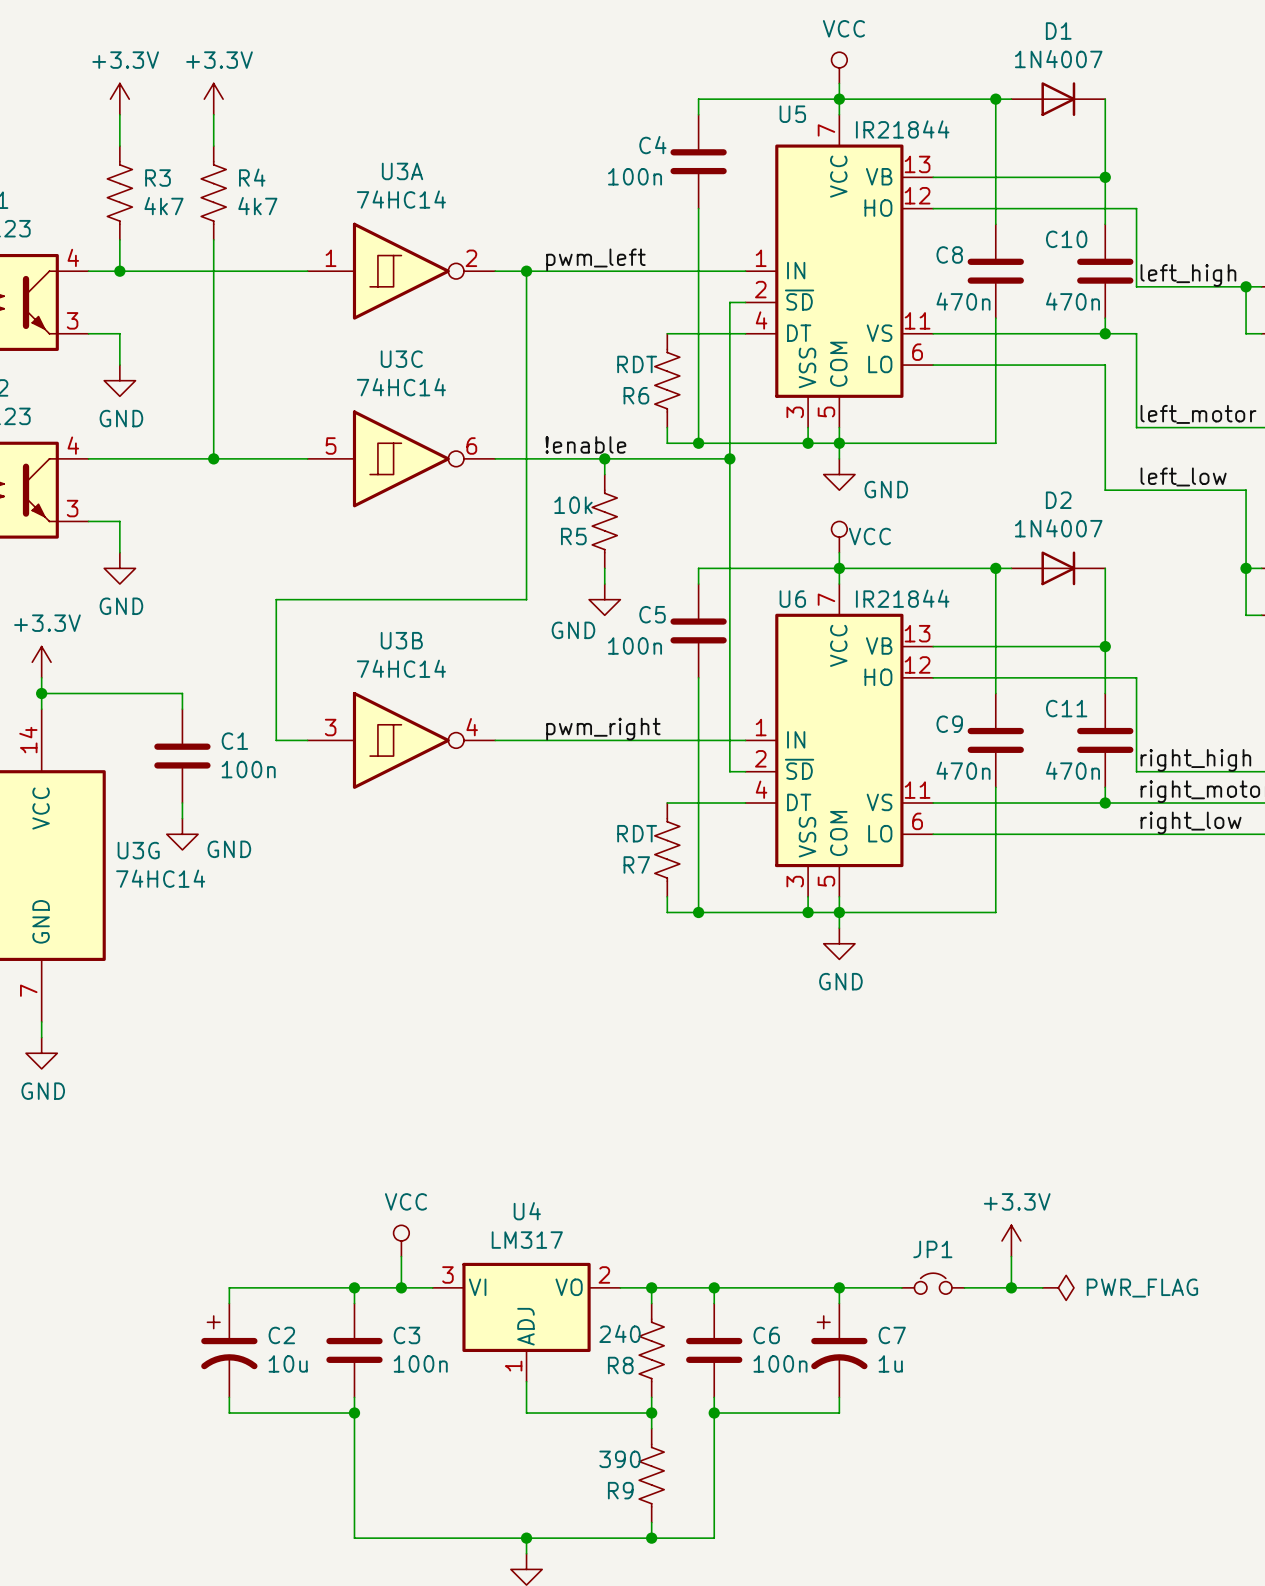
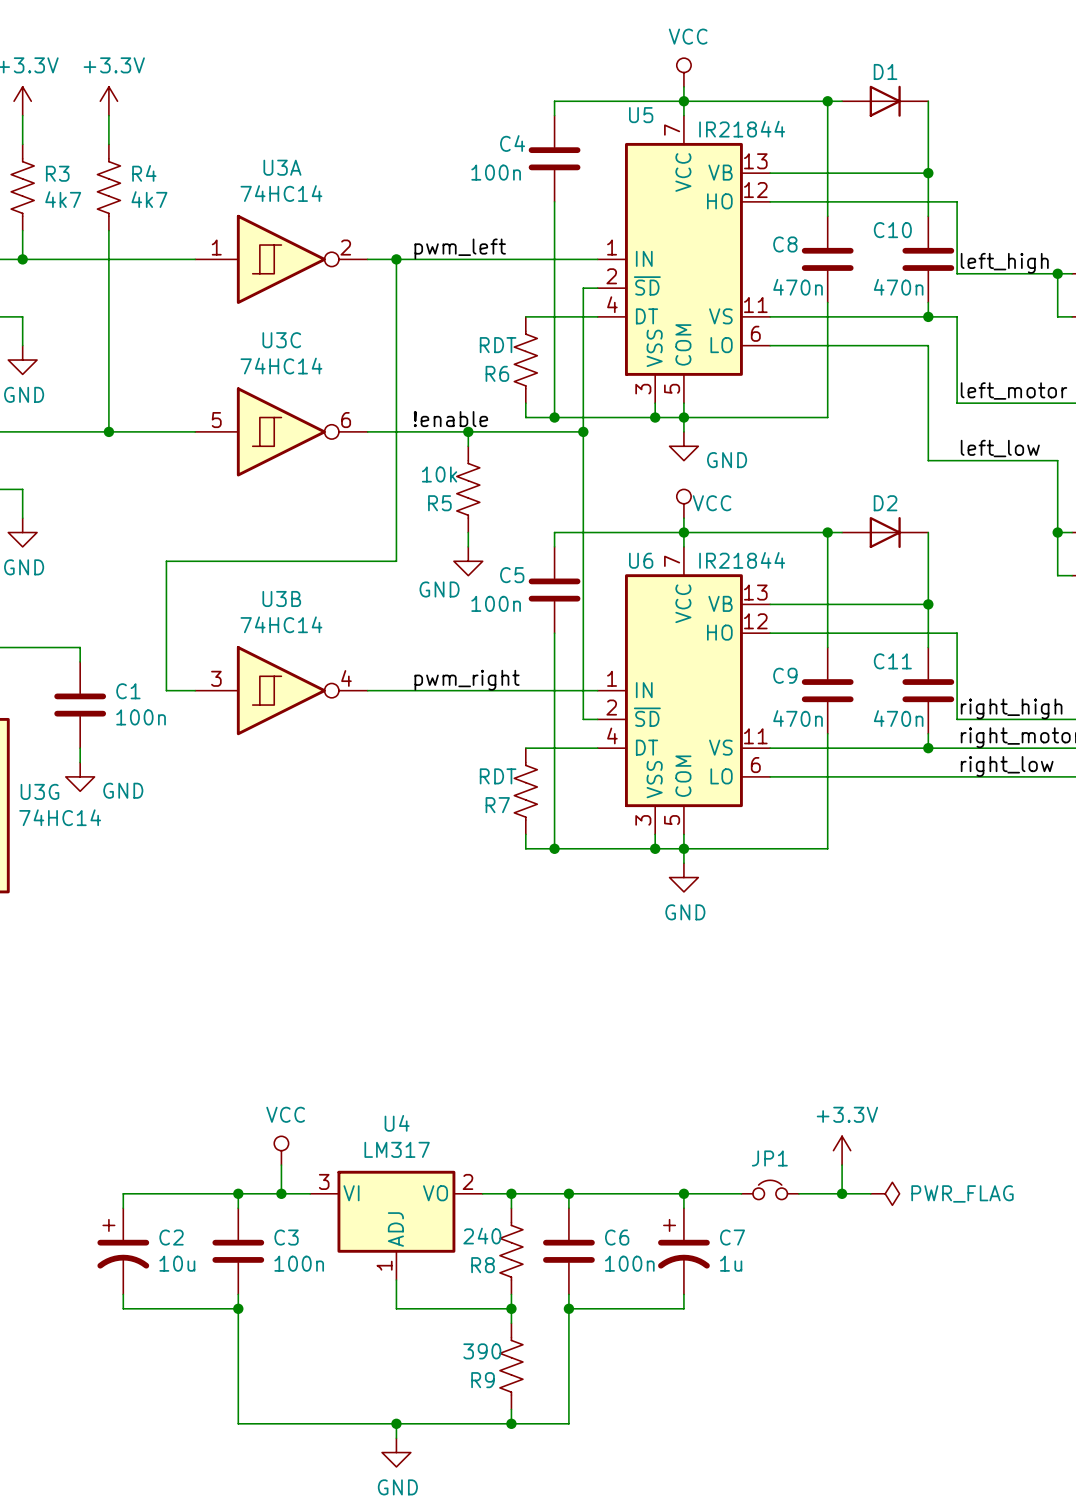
D1 name position: D1 (1058, 30) -> D1 (885, 71)
D1 value: 1N4007 (1058, 59) -> none
D2 name position: D2 (1058, 500) -> D2 (885, 503)
D2 value: 1N4007 (1058, 528) -> none

